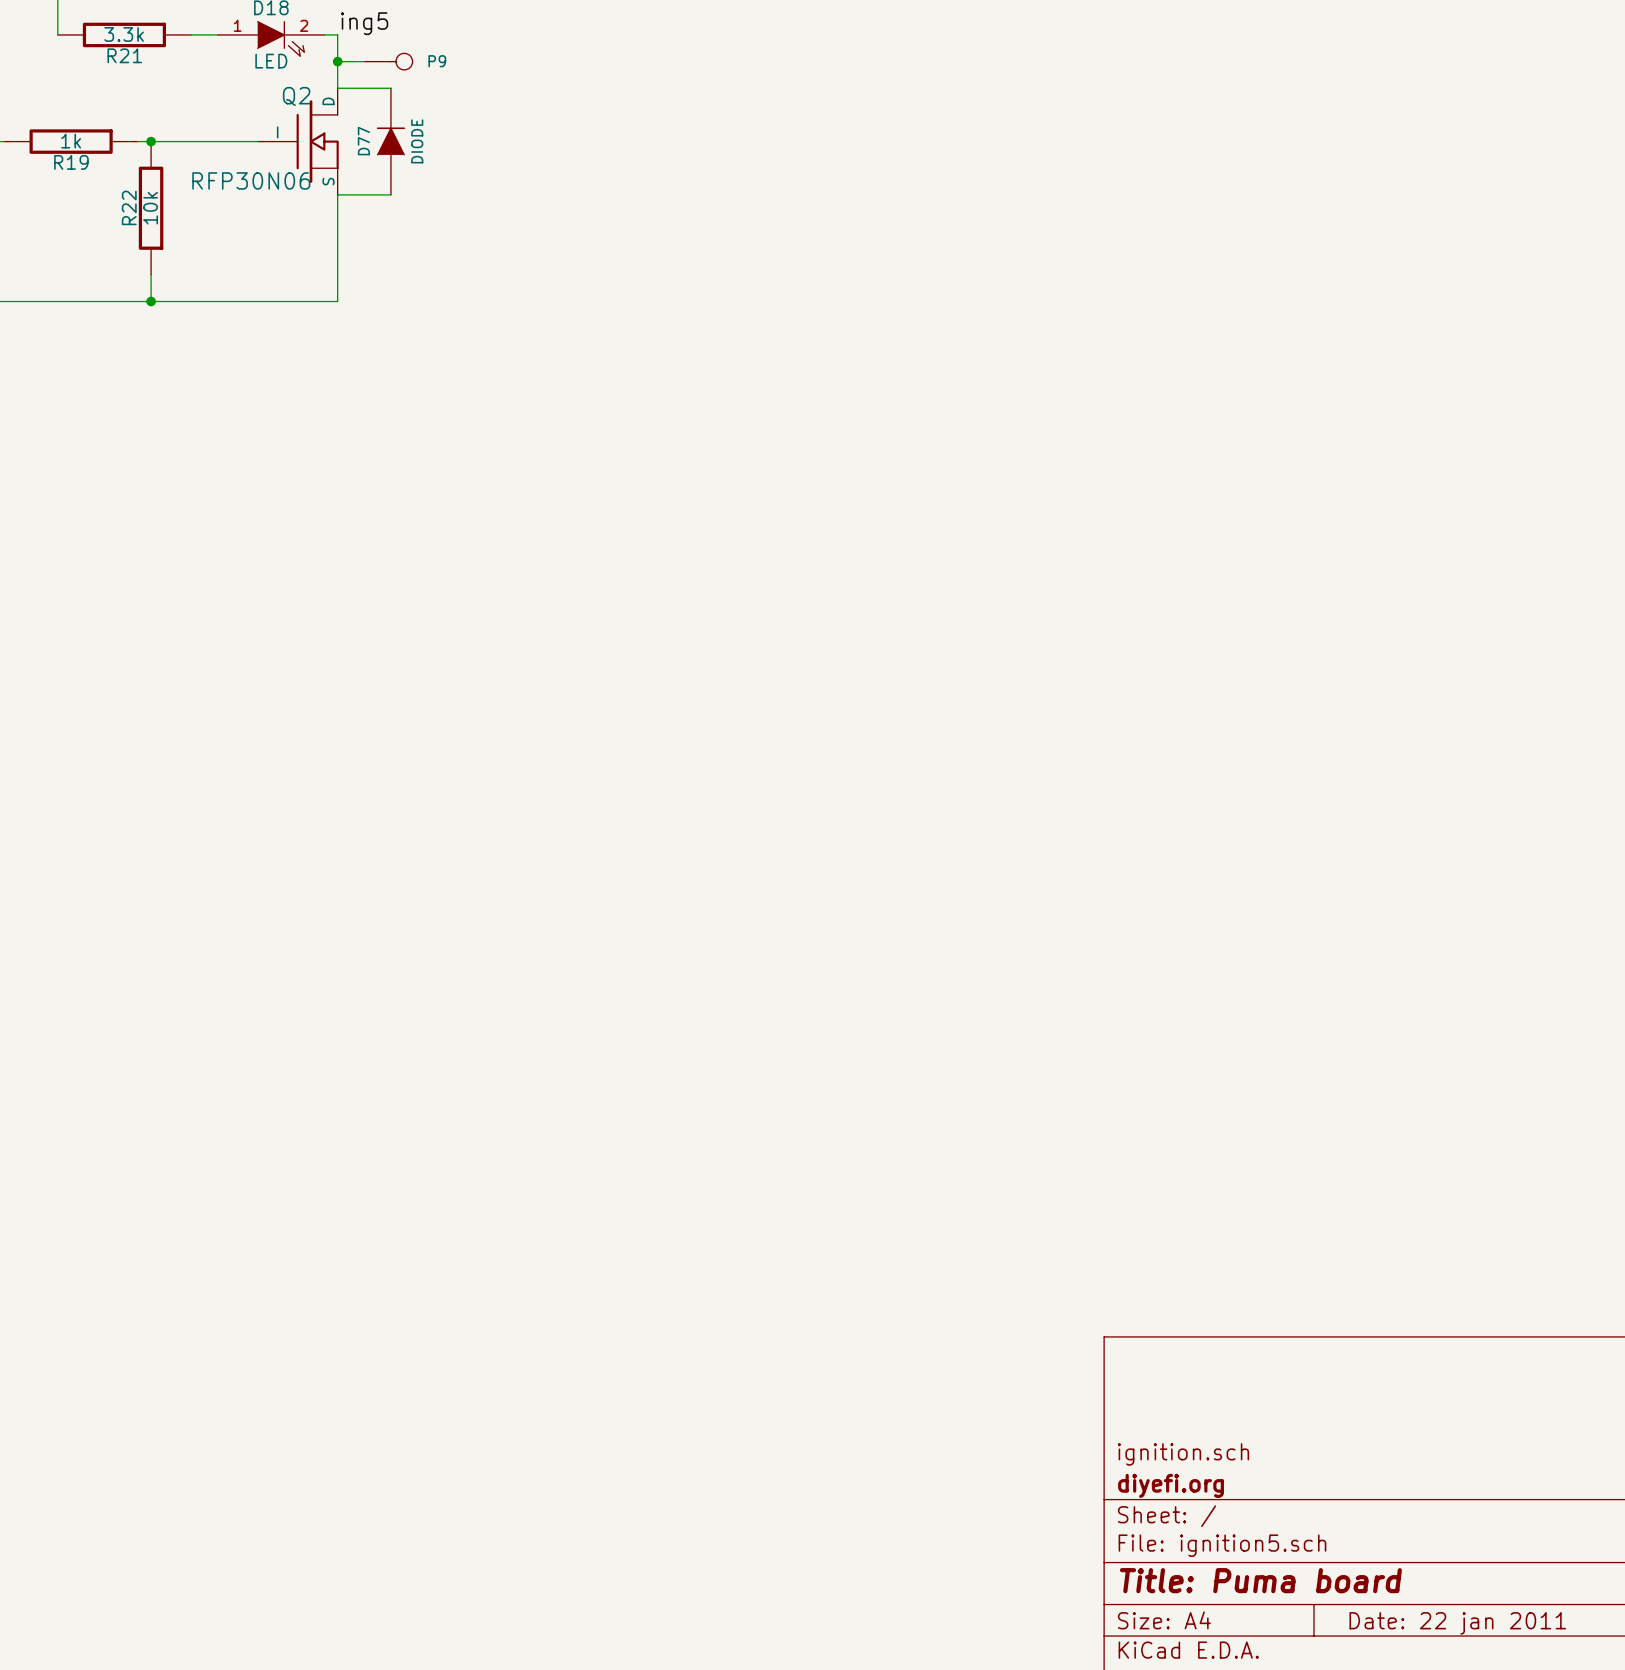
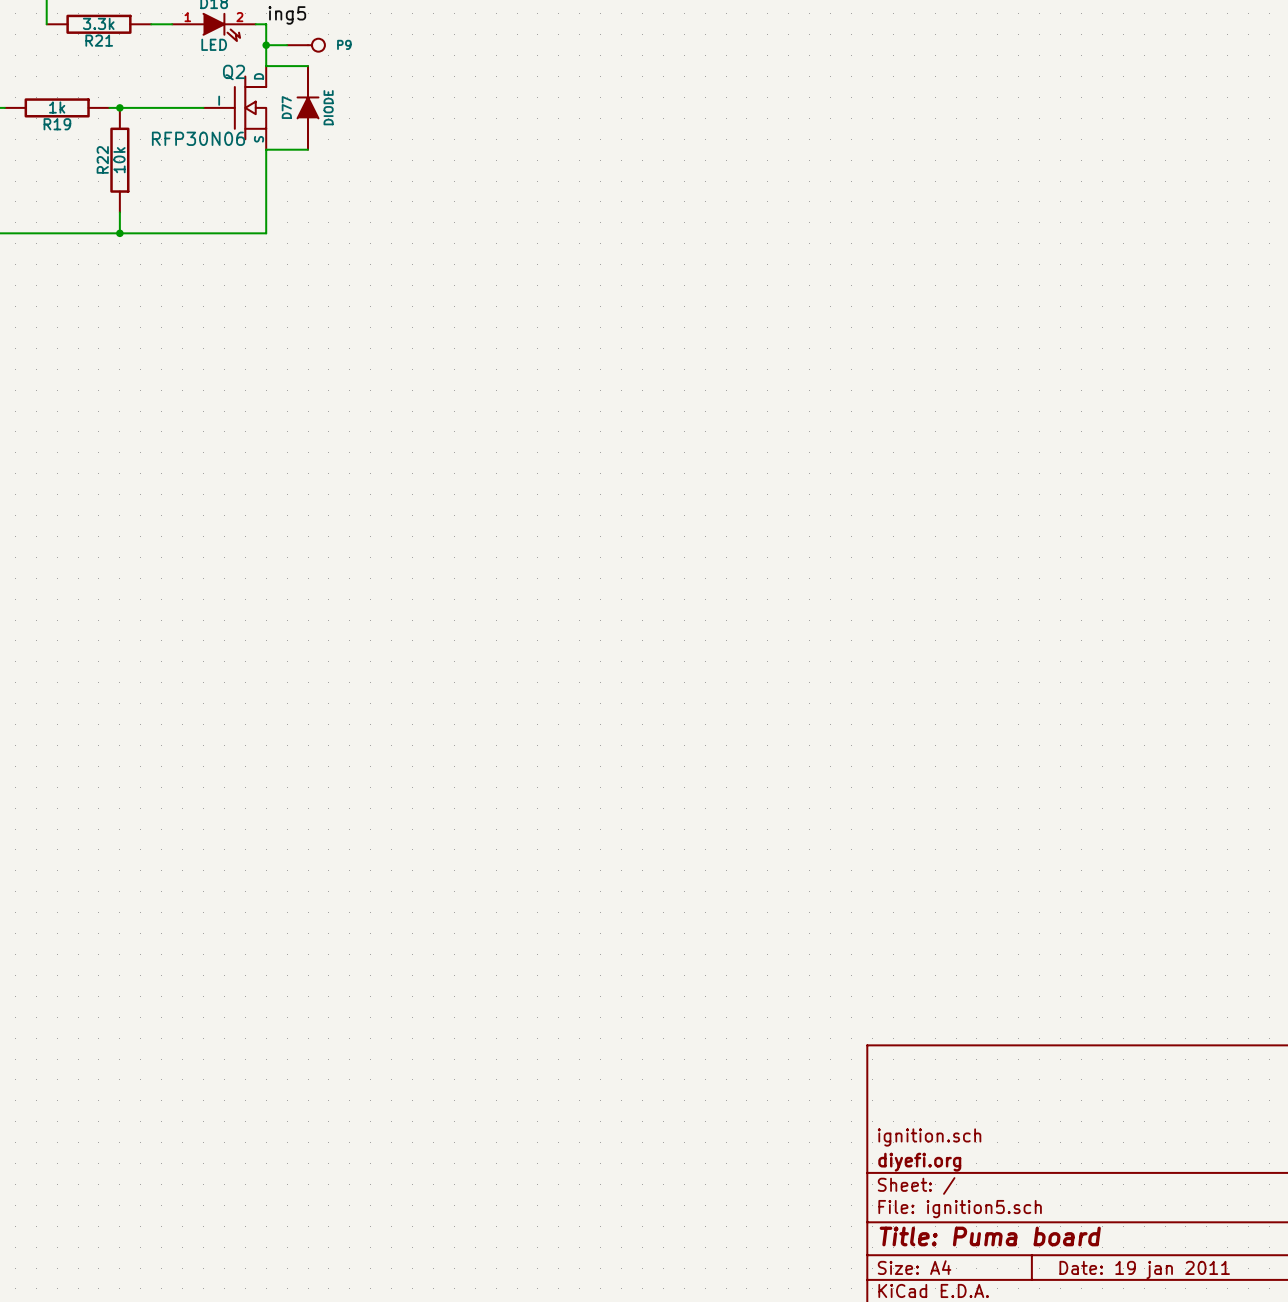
title block: Date: 22 jan 2011 (1457, 1623) -> Date: 19 jan 2011 (1144, 1269)

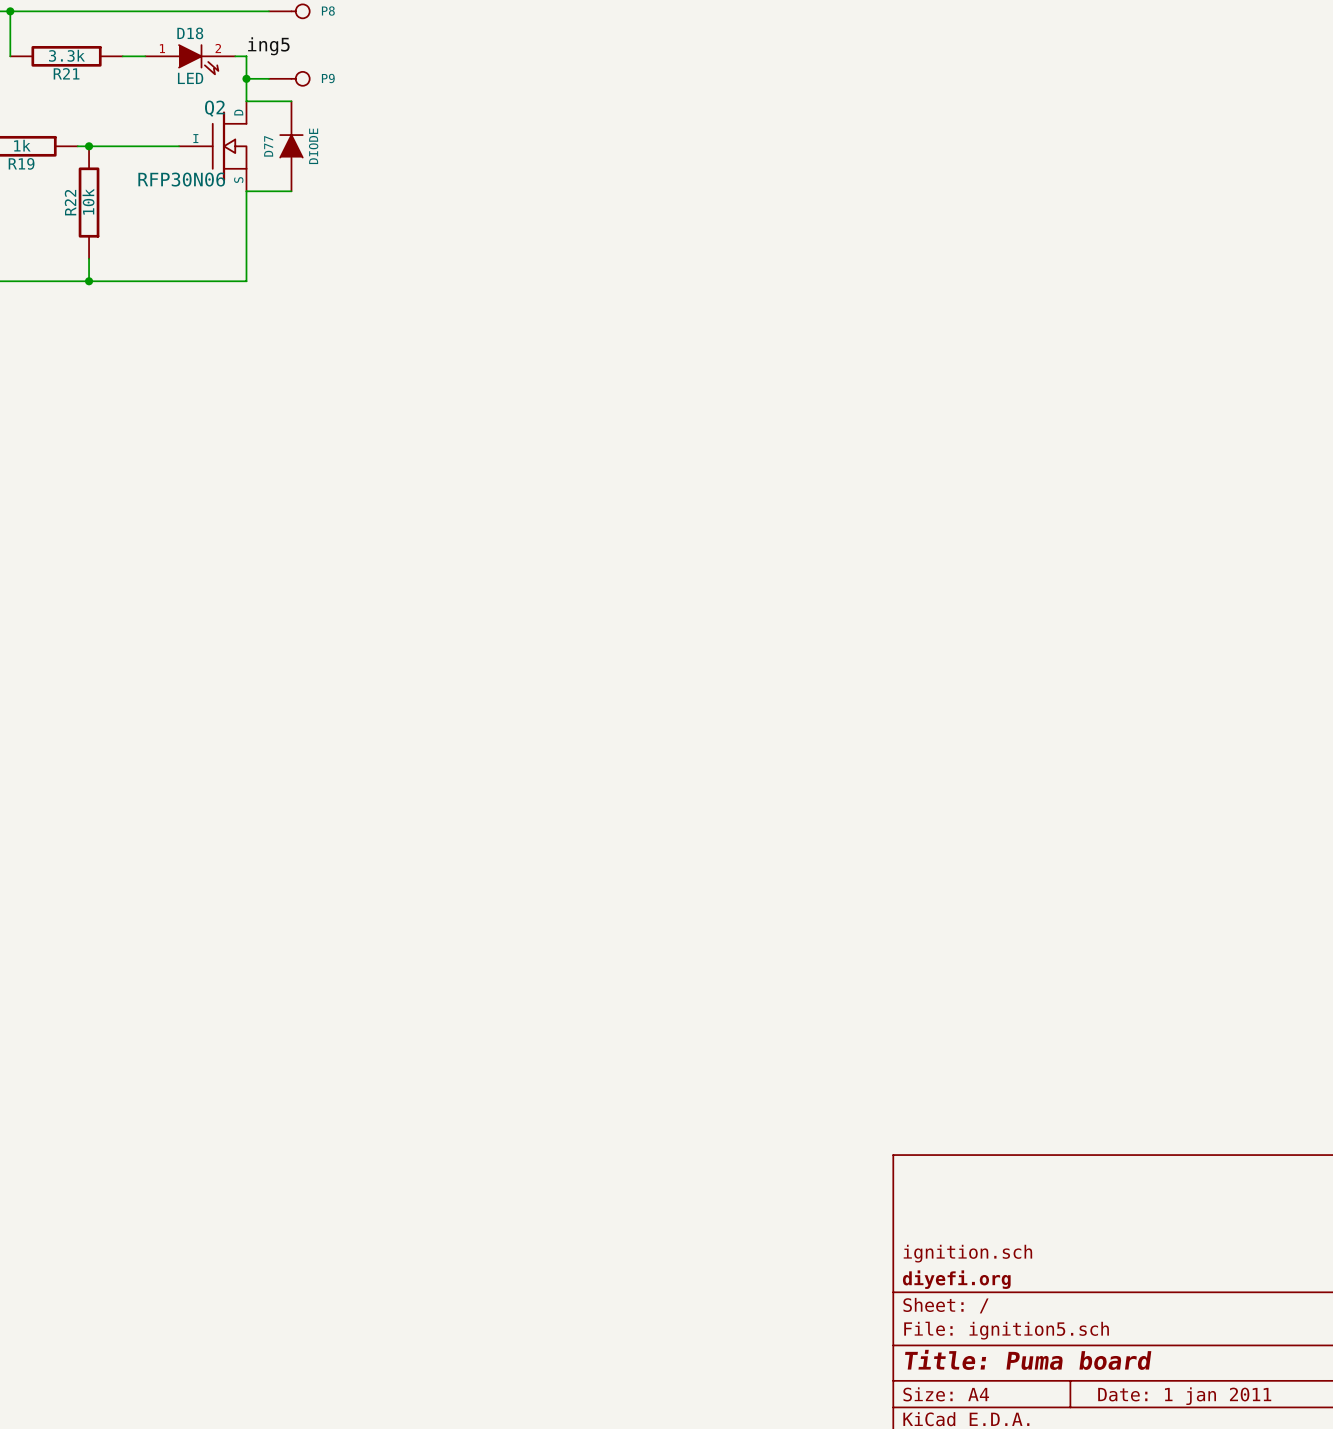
title block: Date: 19 jan 2011 (1144, 1269) -> Date: 1 jan 2011 (1184, 1396)

